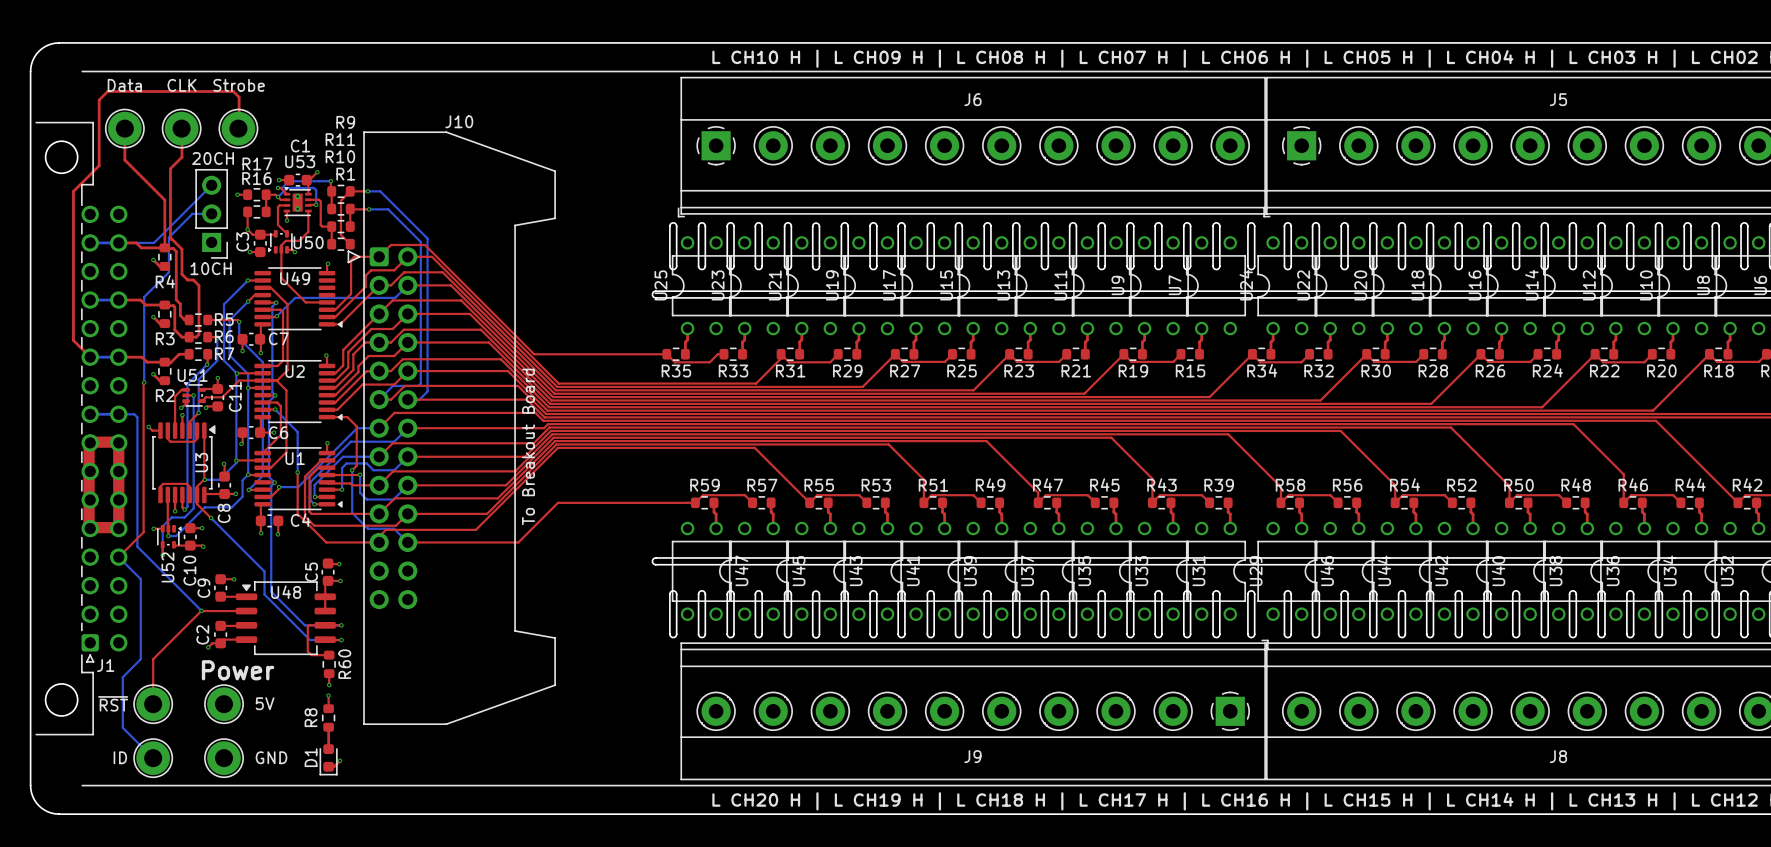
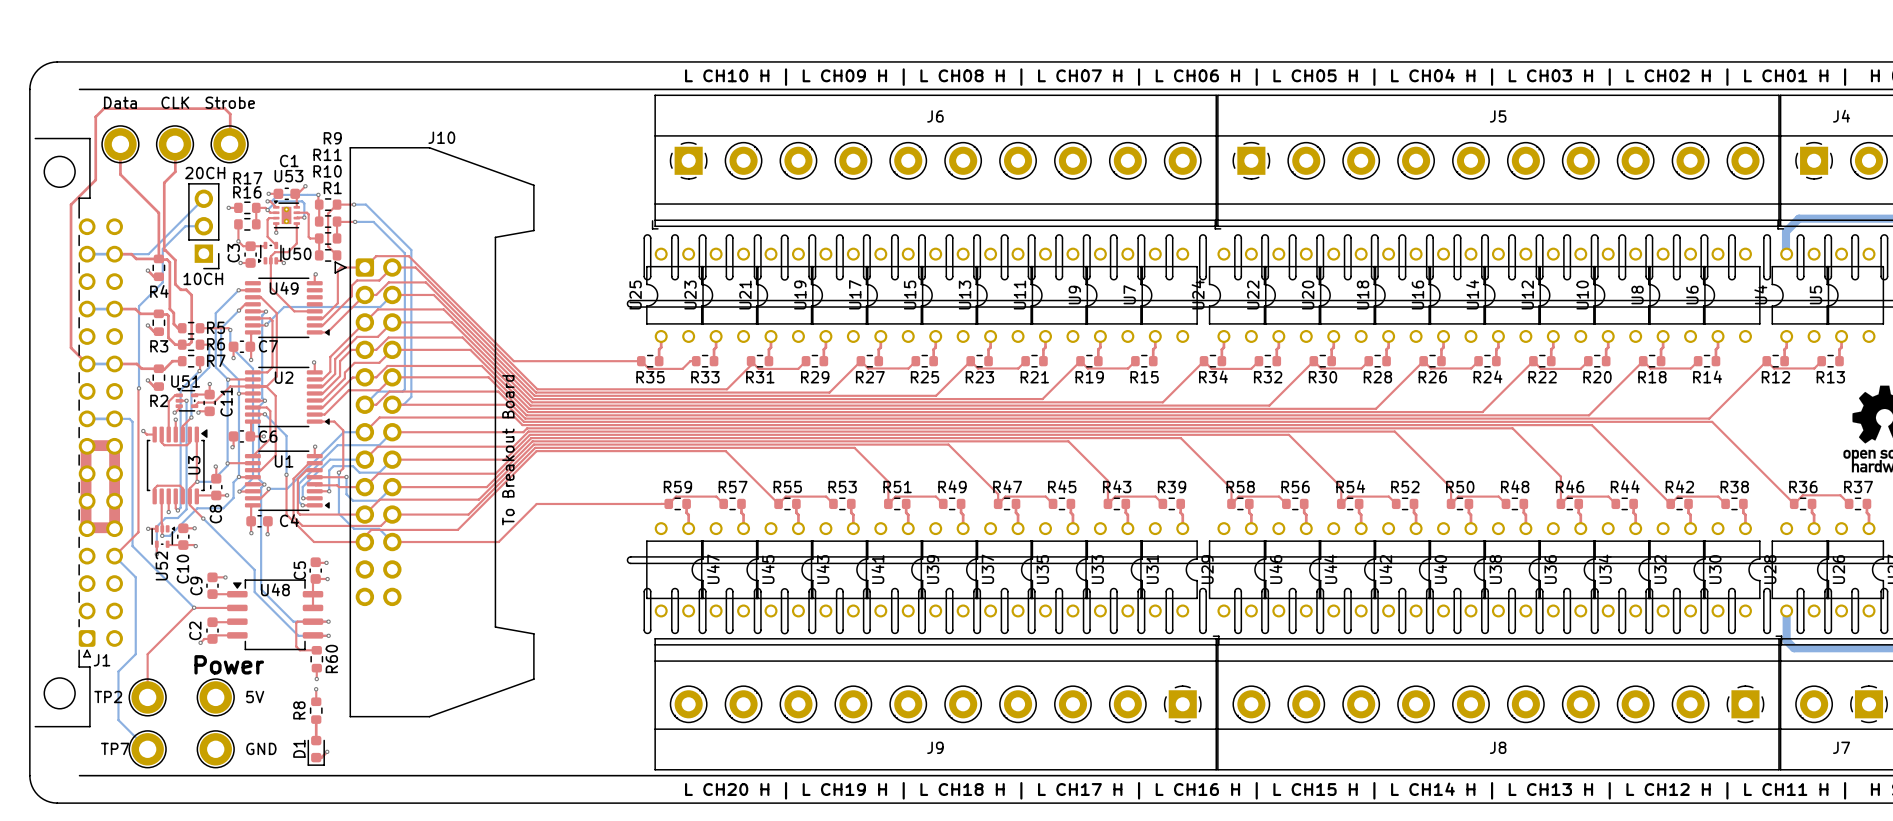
TP2 name: none -> TP2 (108, 697)
text: ~{RST} (113, 703) -> none
TP7 name: none -> TP7 (115, 748)
text: ID (120, 757) -> none

